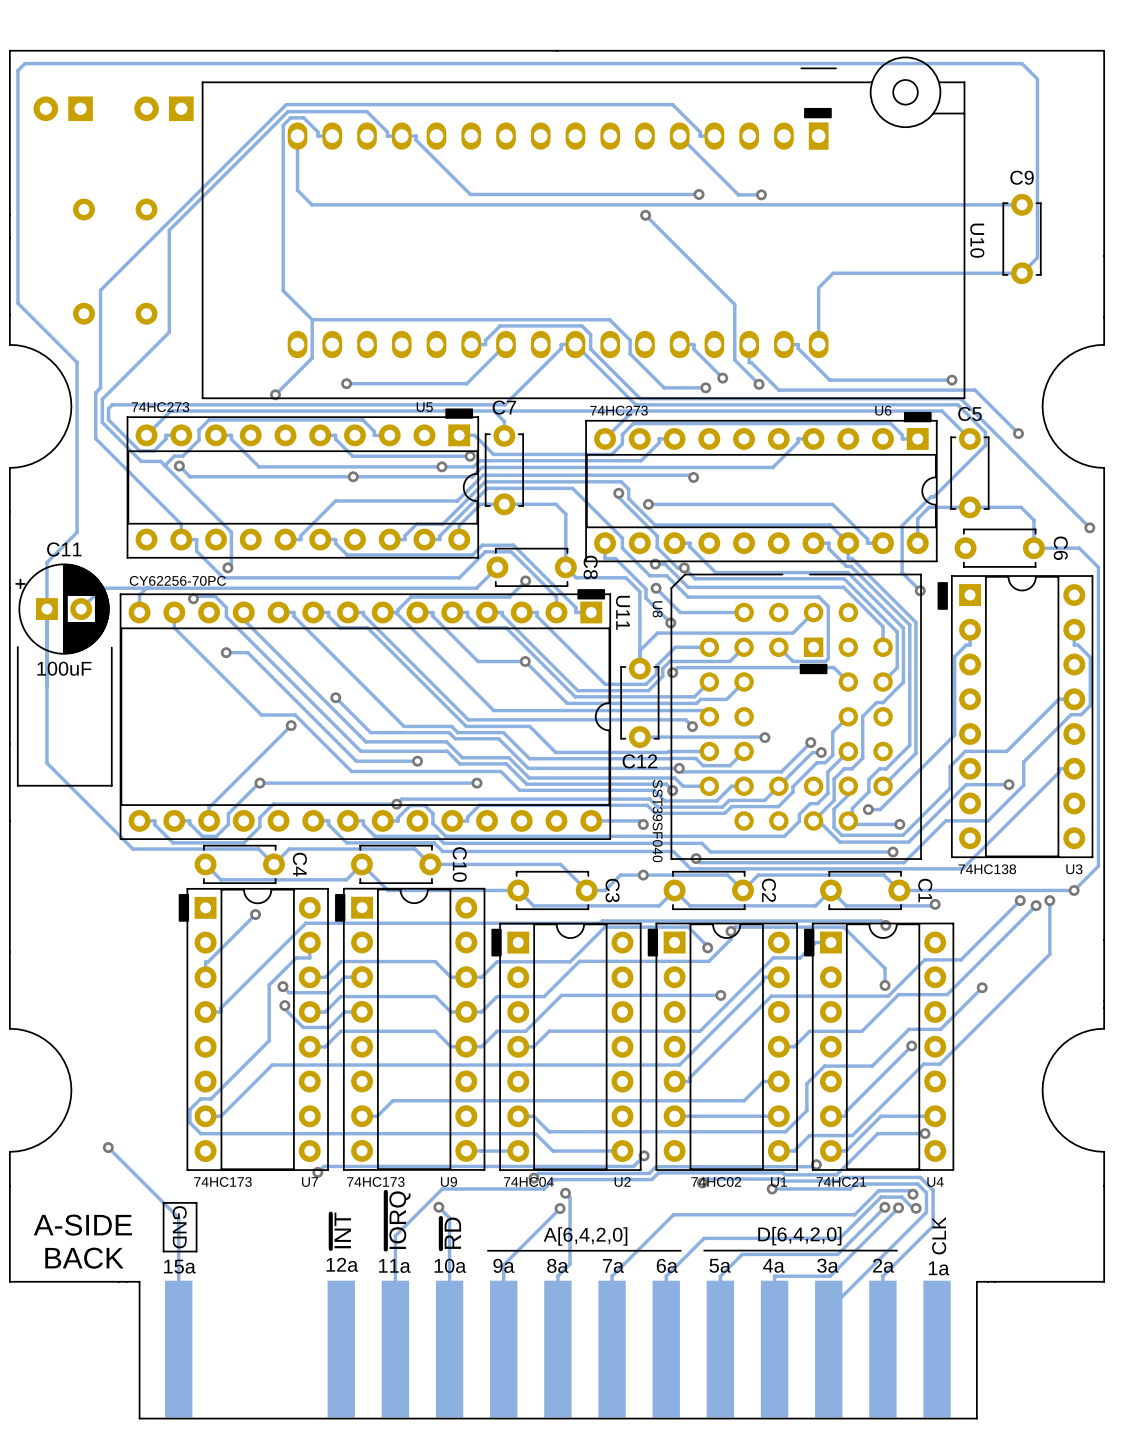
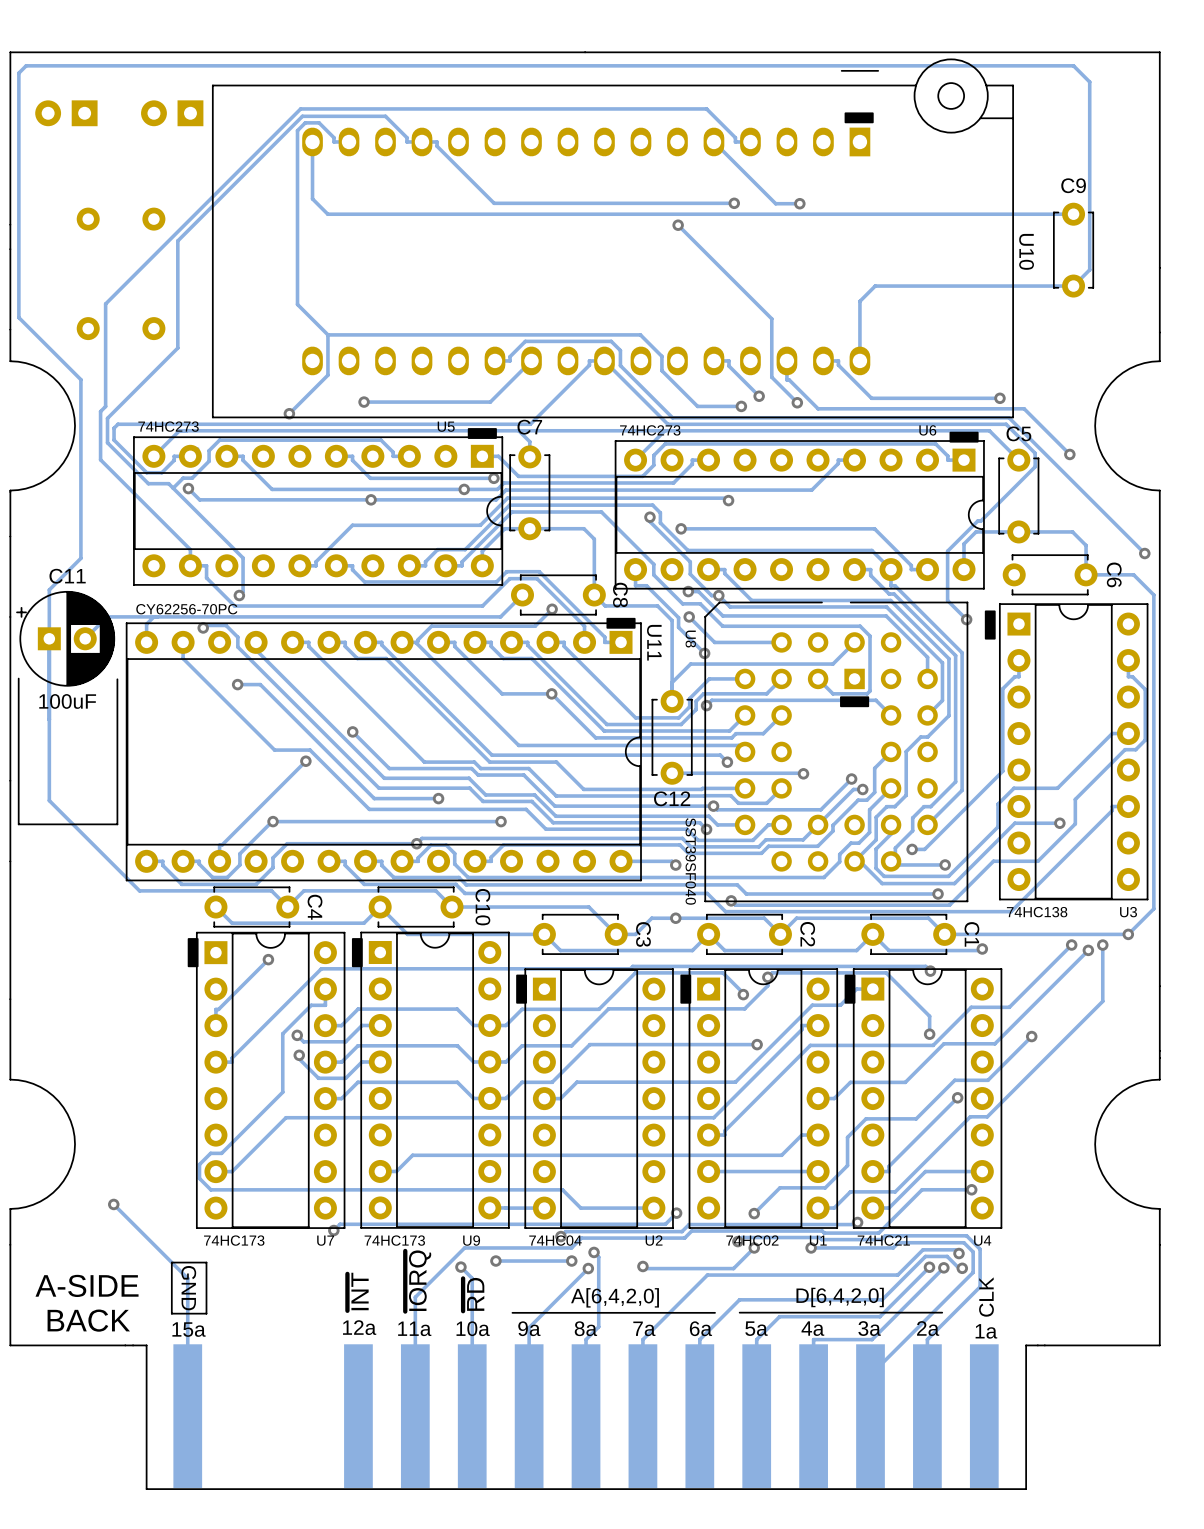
track: (518, 1116) (533, 1116) (549, 1131) (742, 1131) -> (754, 1213) (779, 1187)
via: none -> (754, 1213)
track: none -> (754, 1247) (733, 1268) (645, 1268) (642, 1266)
via: none -> (754, 1247)
via: none -> (495, 1261)
track: none -> (571, 1261) (495, 1261)
via: none -> (571, 1261)
via: none -> (642, 1266)

